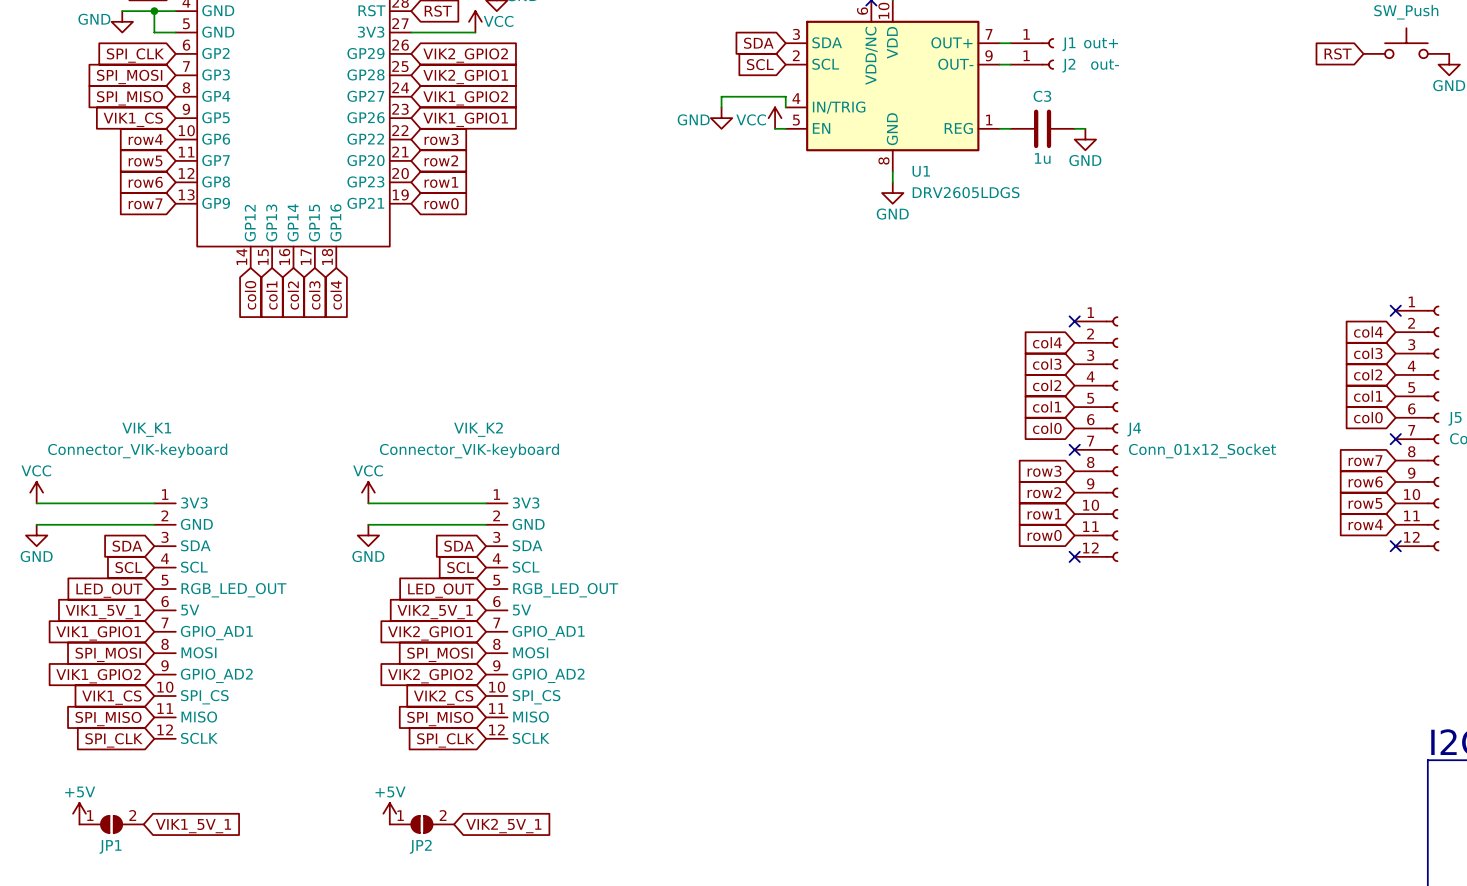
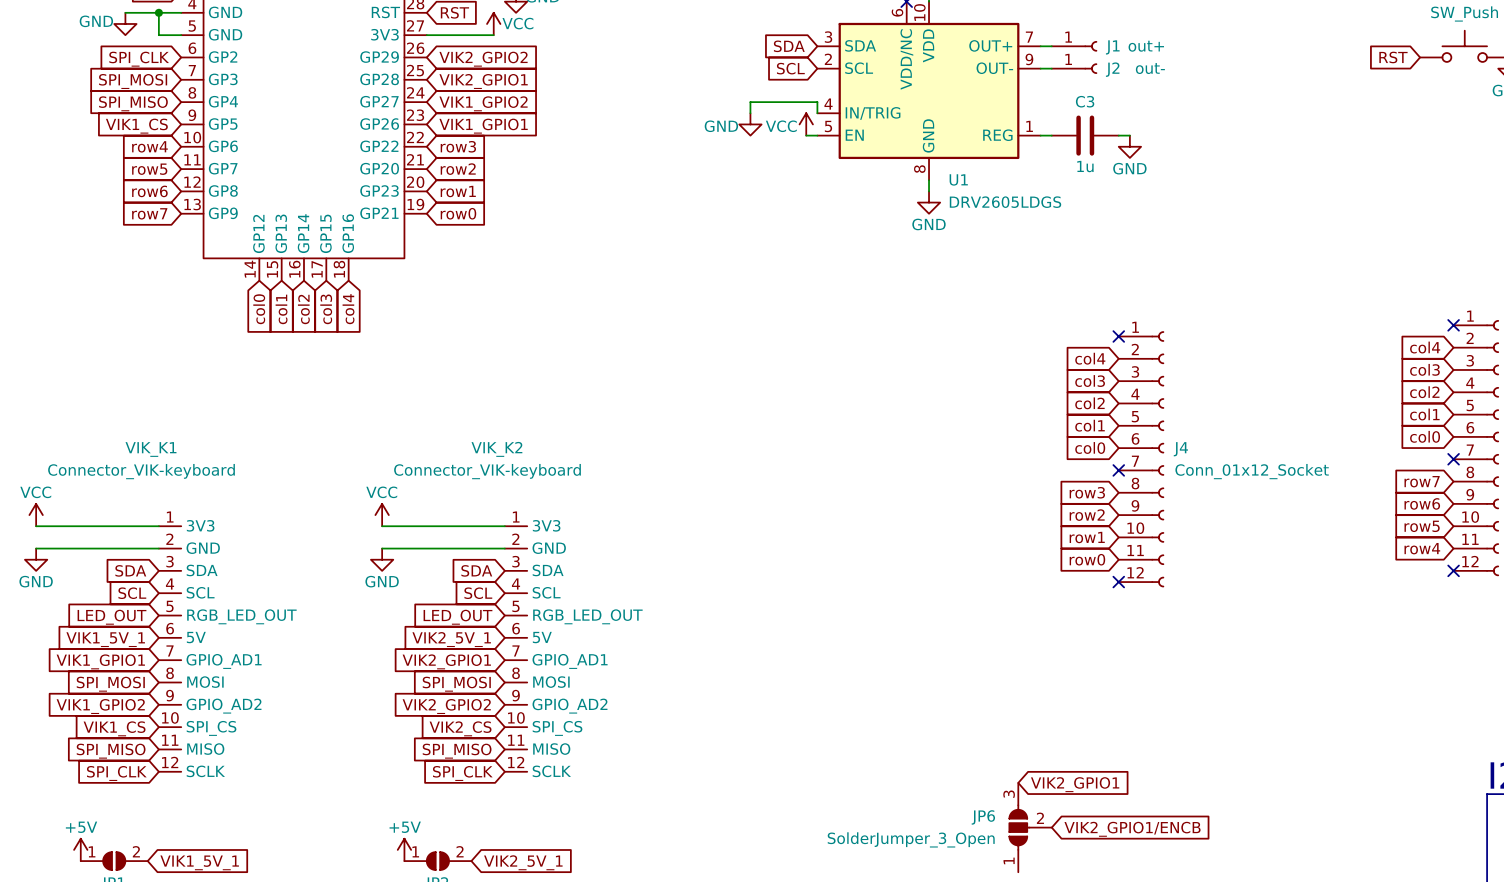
global label: none -> VIK2_GPIO1 (1075, 784)
JP6: none -> SolderJumper_3_Open (1030, 827)
global label: none -> VIK2_GPIO1/ENCB (1132, 829)

